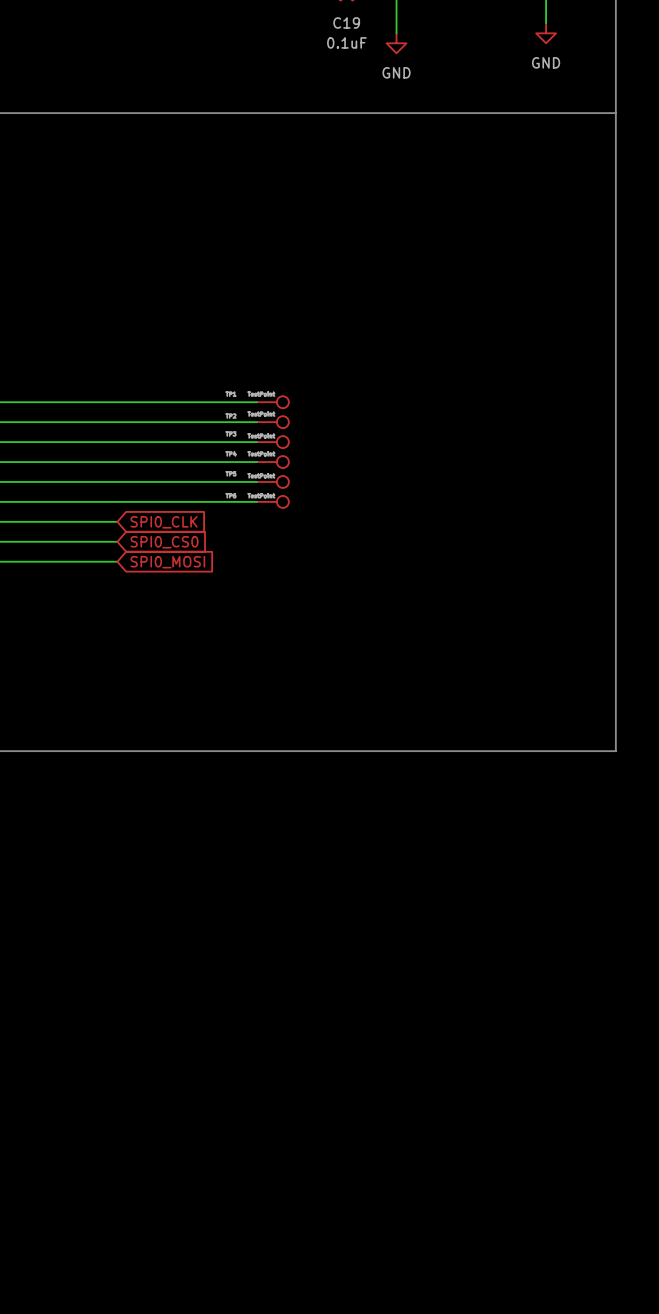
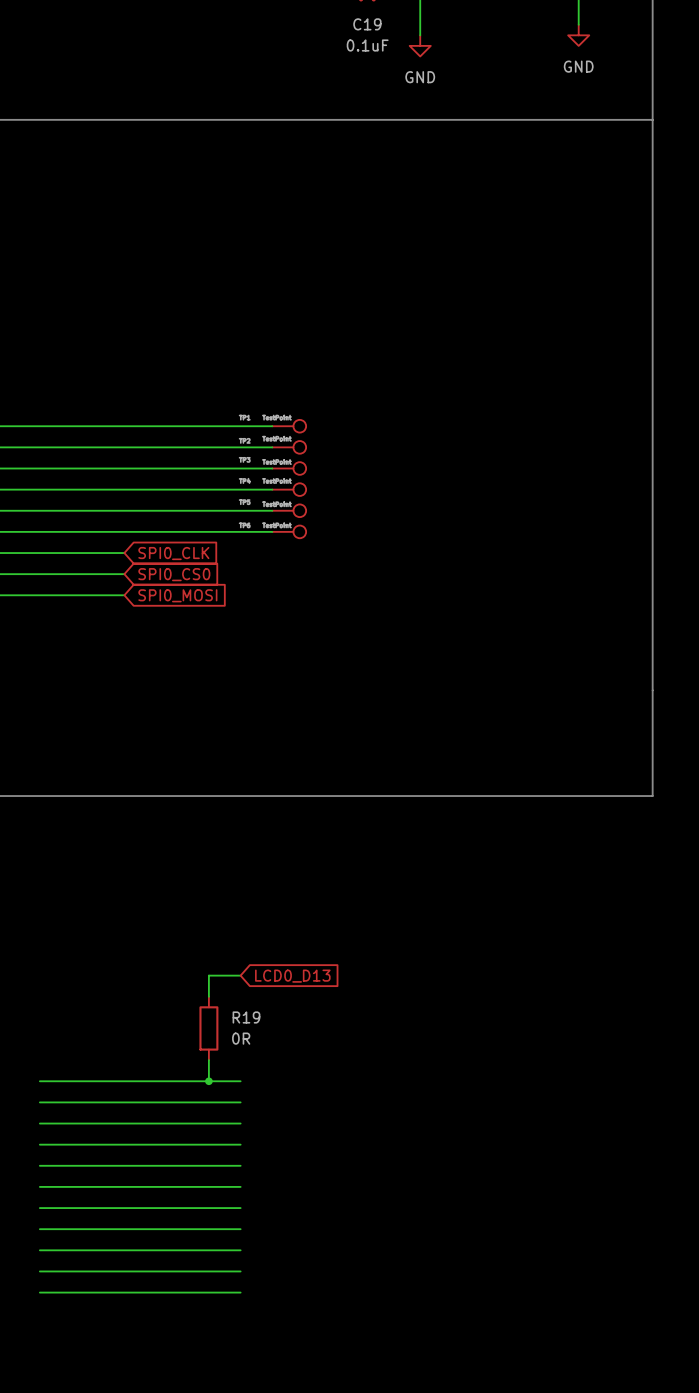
wire: none -> (240, 975) (208, 975) (208, 996)
global label: none -> LCD0_D13 (292, 976)
R19: none -> 0R (208, 1028)
wire: none -> (208, 1060) (208, 1081)
wire: none -> (39, 1081) (240, 1081)
junction: none -> (208, 1081)
wire: none -> (39, 1102) (240, 1102)
wire: none -> (39, 1123) (240, 1123)
wire: none -> (39, 1144) (240, 1144)
wire: none -> (39, 1165) (240, 1165)
wire: none -> (39, 1186) (240, 1186)
wire: none -> (39, 1208) (240, 1208)
wire: none -> (39, 1229) (240, 1229)
wire: none -> (39, 1250) (240, 1250)
wire: none -> (39, 1271) (240, 1271)
wire: none -> (39, 1292) (240, 1292)

